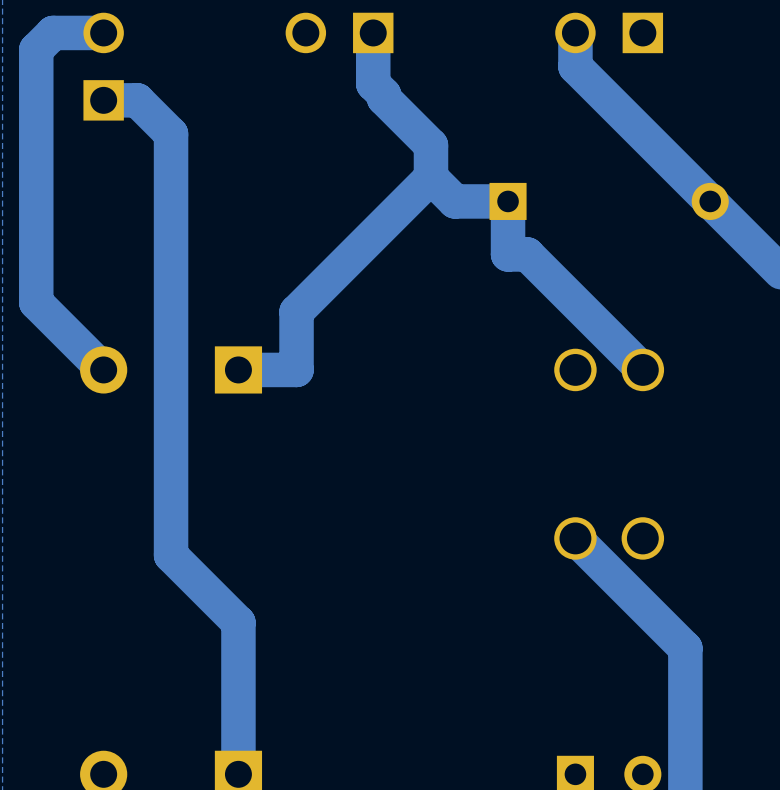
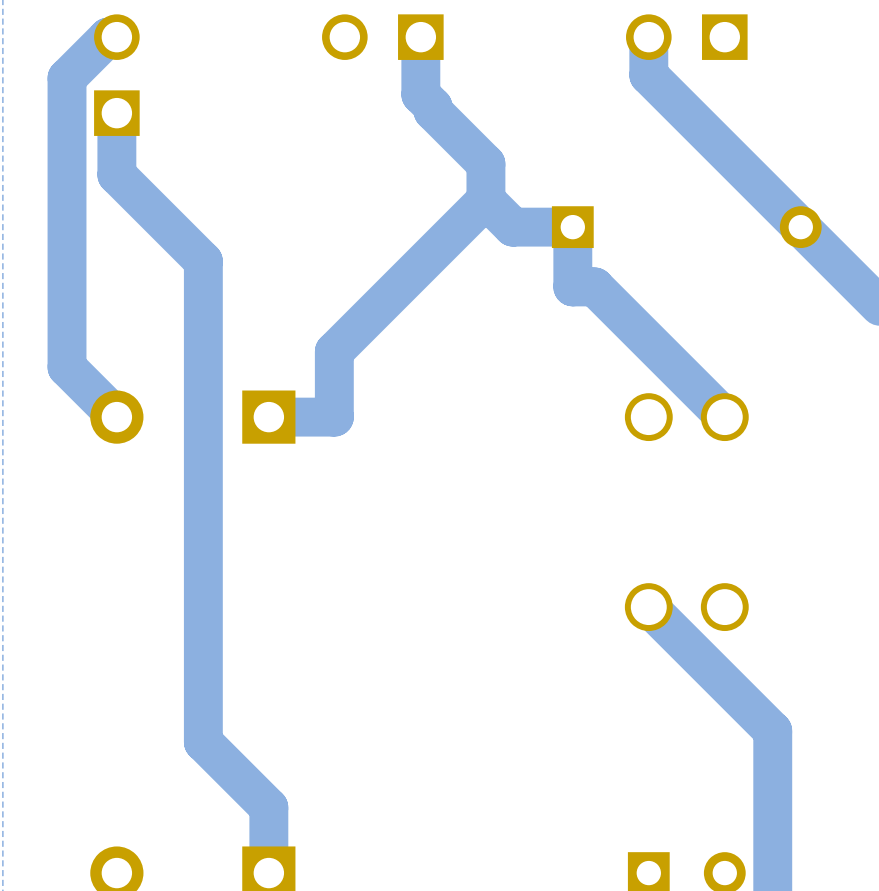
track: (95, 32) (53, 32) (36, 49) (36, 302) (59, 325) -> (107, 37) (67, 78) (67, 367)
track: (103, 100) (137, 100) (171, 134) (171, 555) (238, 622) (238, 716) -> (116, 113) (116, 174) (203, 261) (203, 742) (268, 807)

